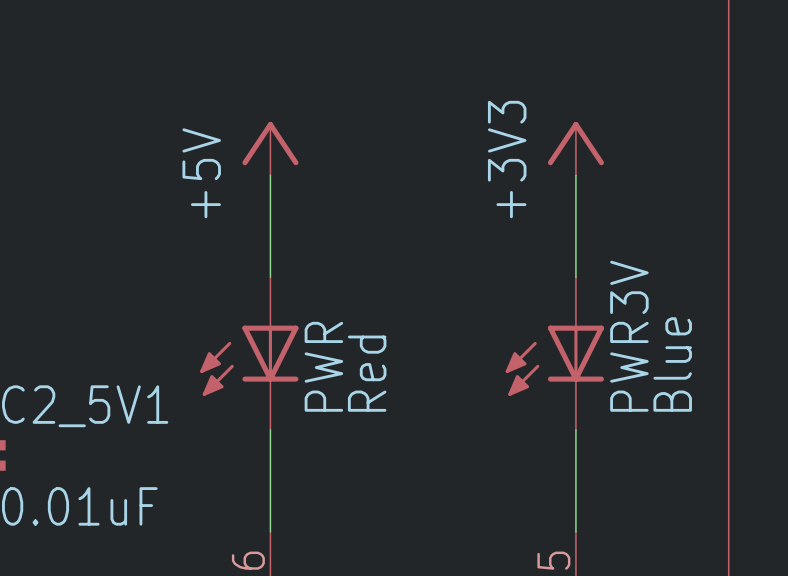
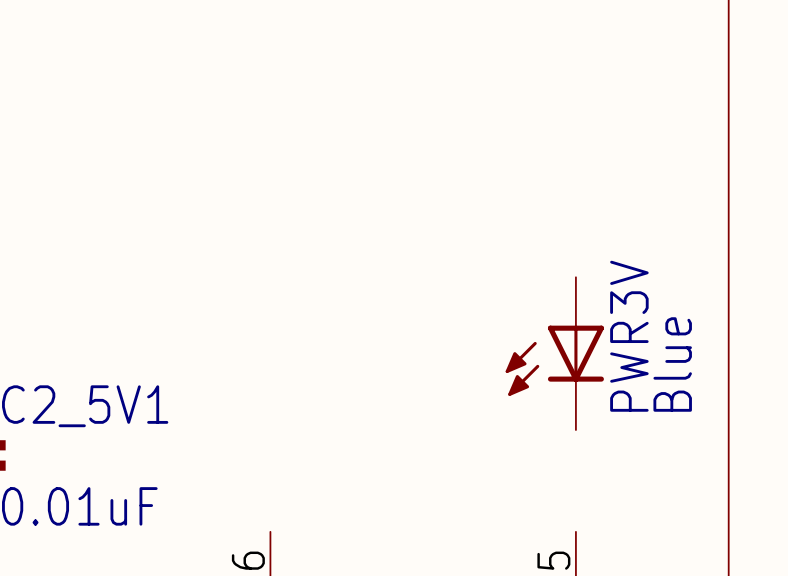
power symbol: +5V (270, 148) -> none
power symbol: +3V3 (575, 148) -> none
wire: (270, 175) (270, 277) -> none
wire: (575, 175) (575, 277) -> none
PWR: Red (249, 353) -> none
wire: (270, 430) (270, 531) -> none
wire: (575, 430) (575, 531) -> none

